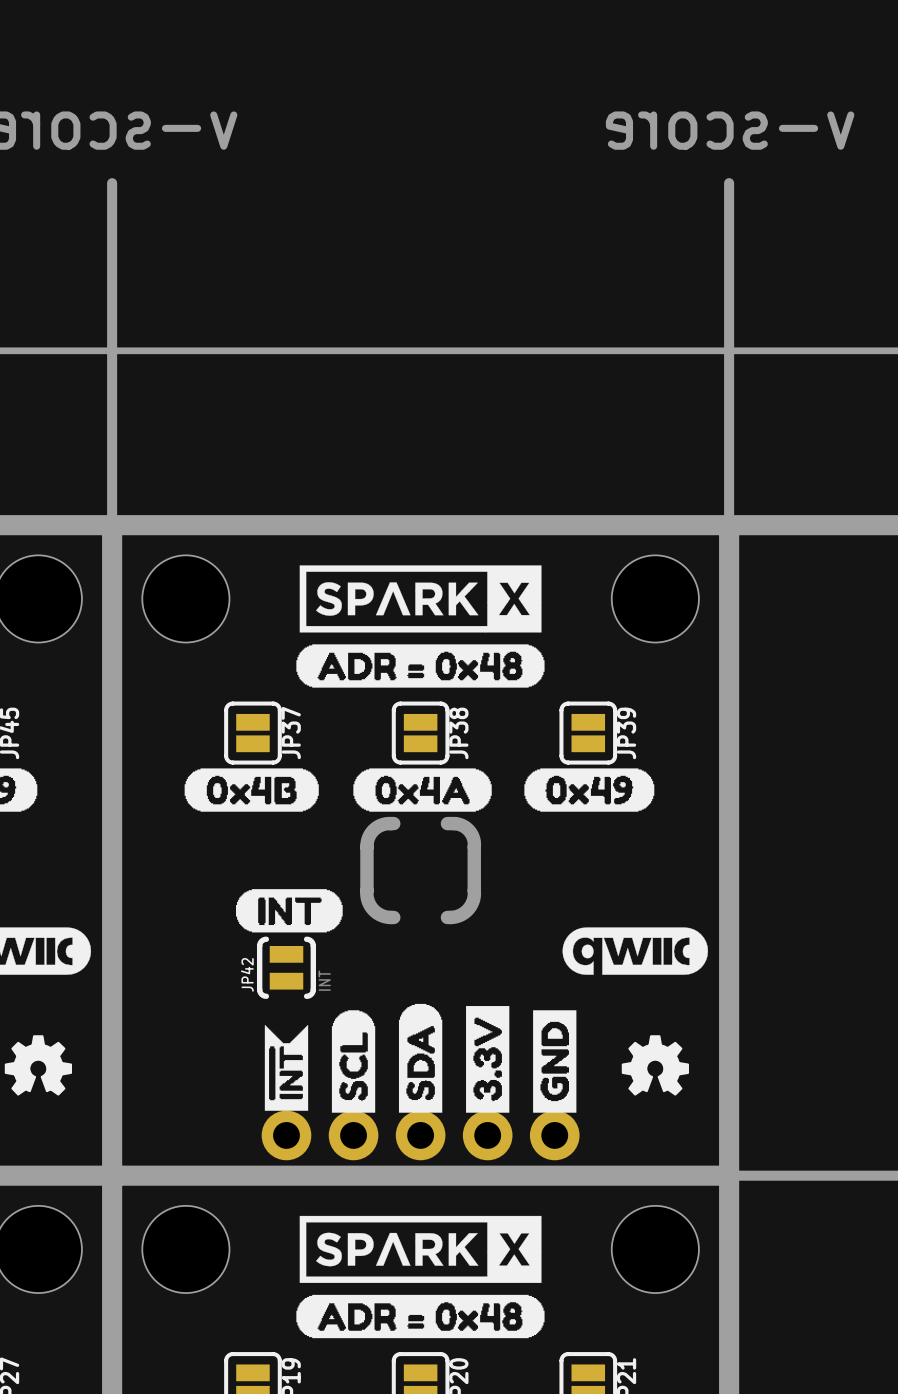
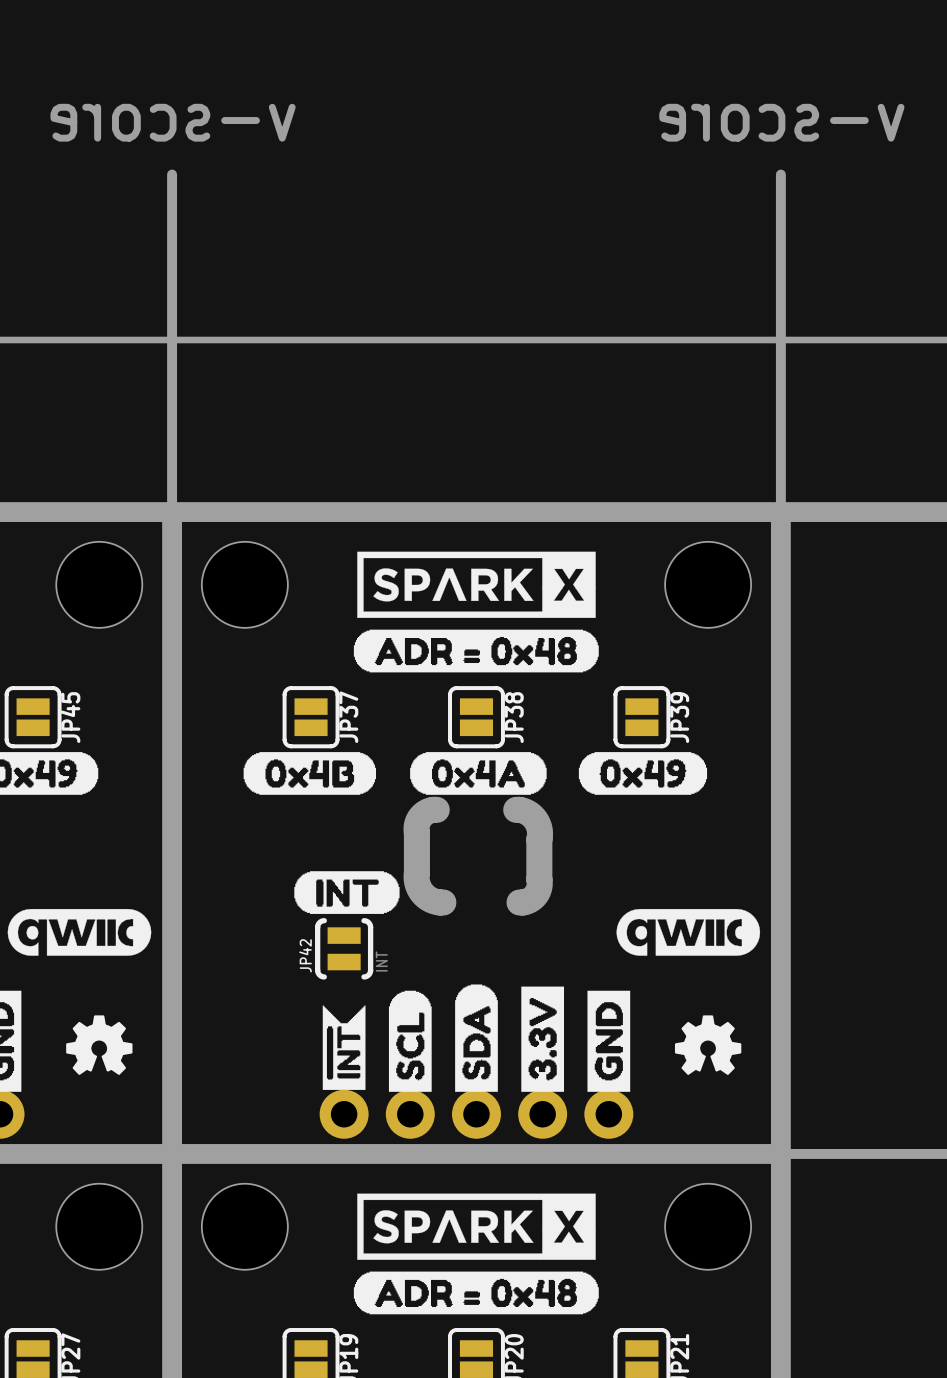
board edge: (393, 823) (377, 826) (368, 839) (366, 893) (369, 904) (374, 911) (384, 916) (393, 917) -> none
board edge: (447, 823) (459, 824) (465, 827) (472, 835) (474, 844) (472, 901) (468, 909) (461, 914) (447, 917) -> none
board edge: none -> (436, 809) (424, 813) (417, 823) (416, 878) (418, 887) (426, 896) (434, 901) (443, 902)
board edge: none -> (516, 809) (525, 811) (532, 816) (538, 825) (540, 833) (539, 888) (531, 899) (519, 902)

